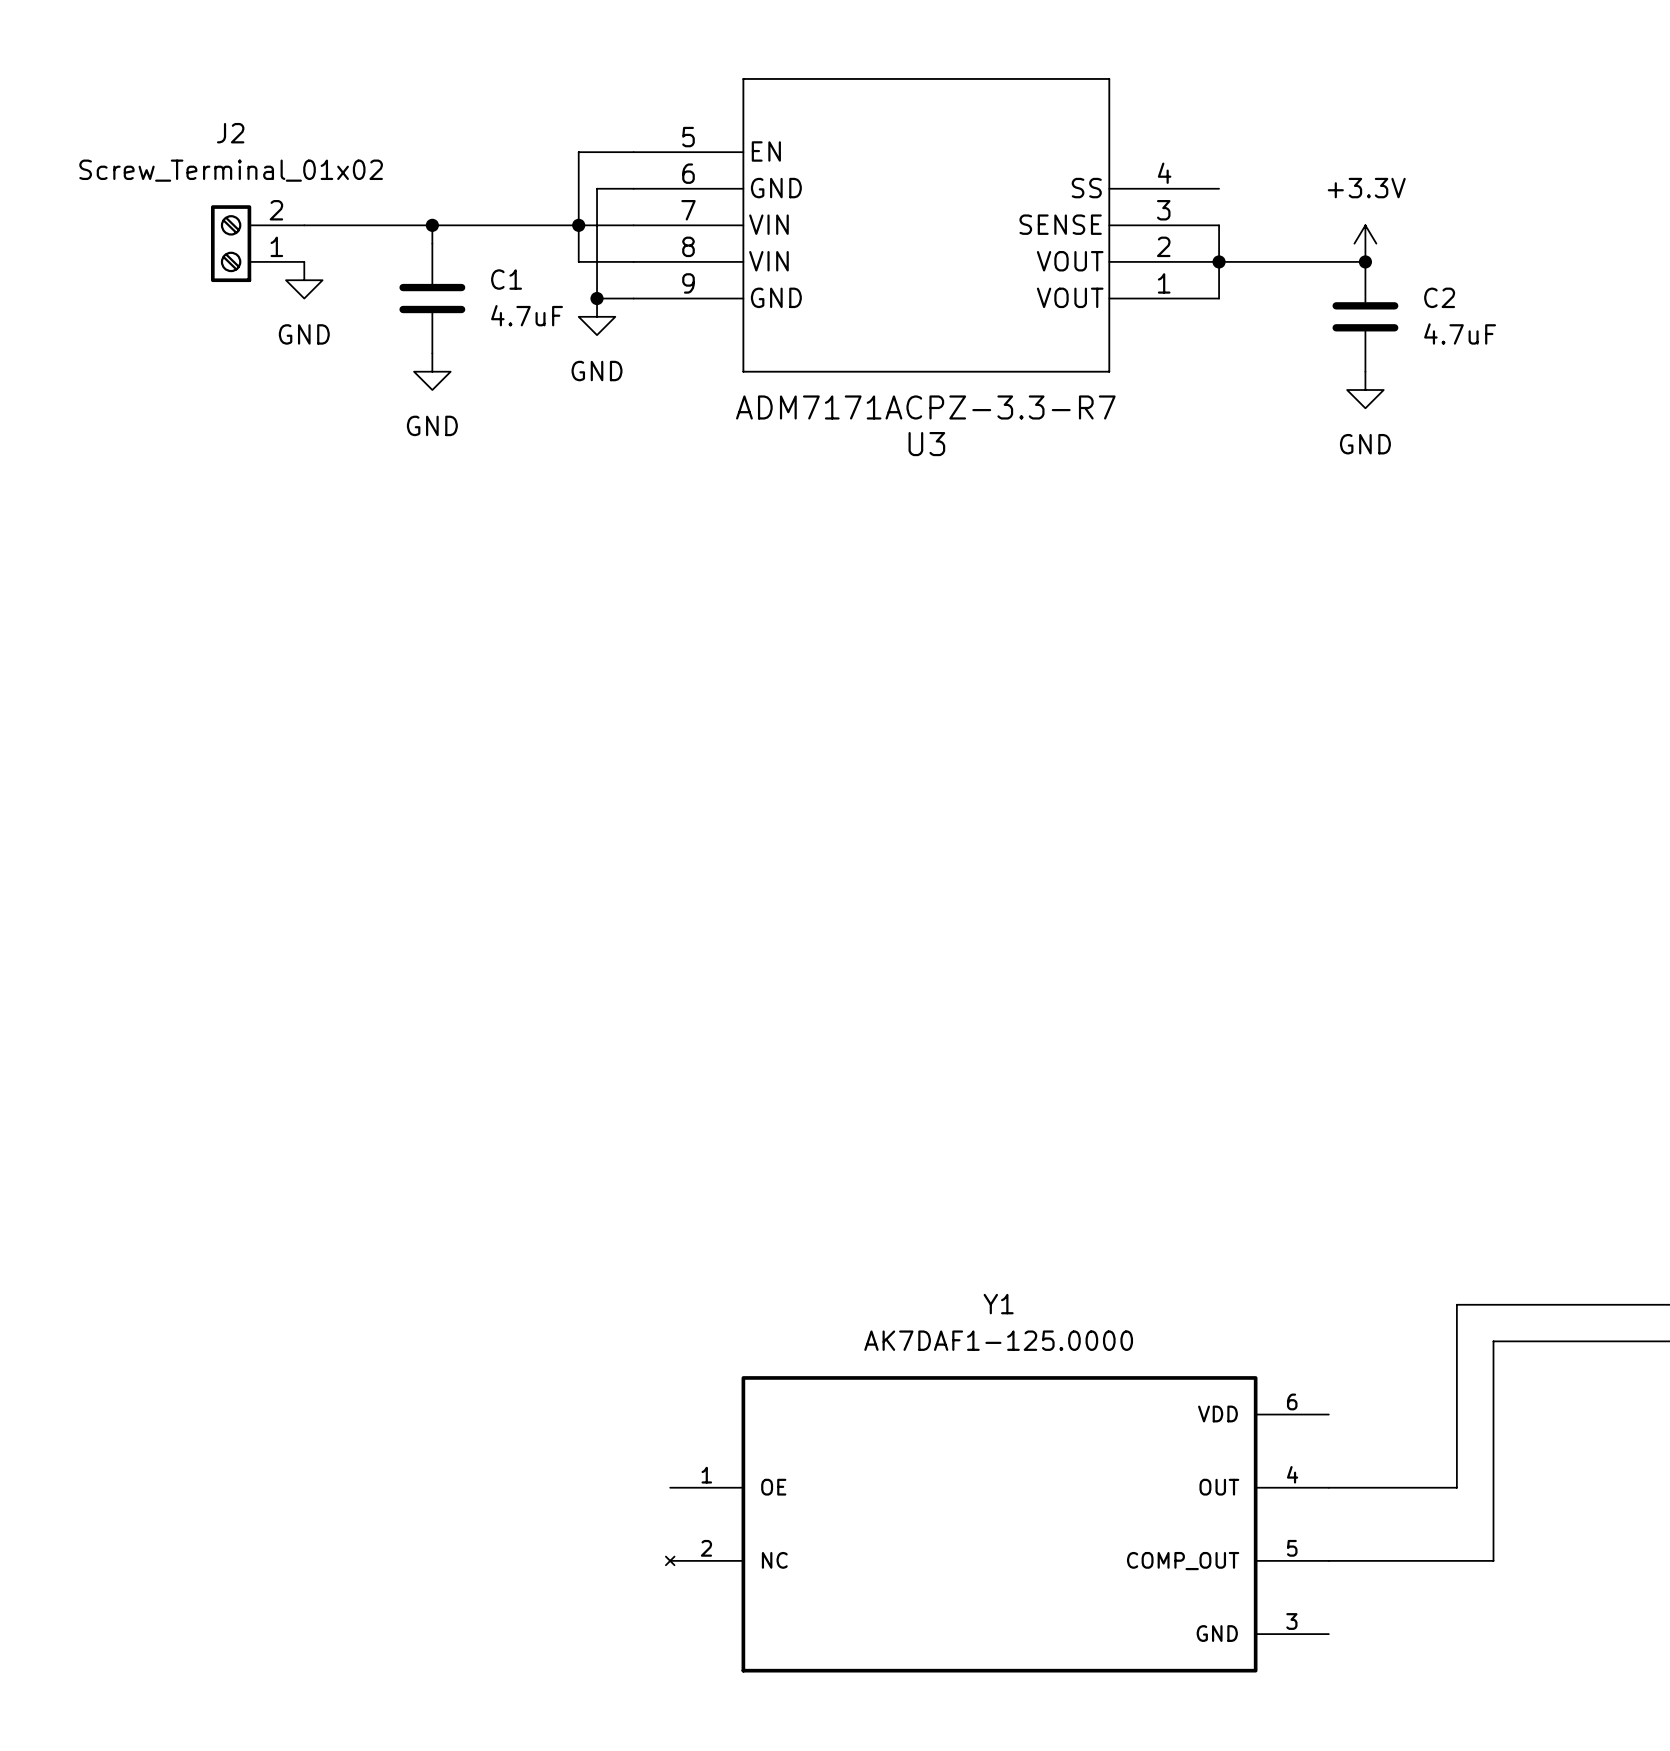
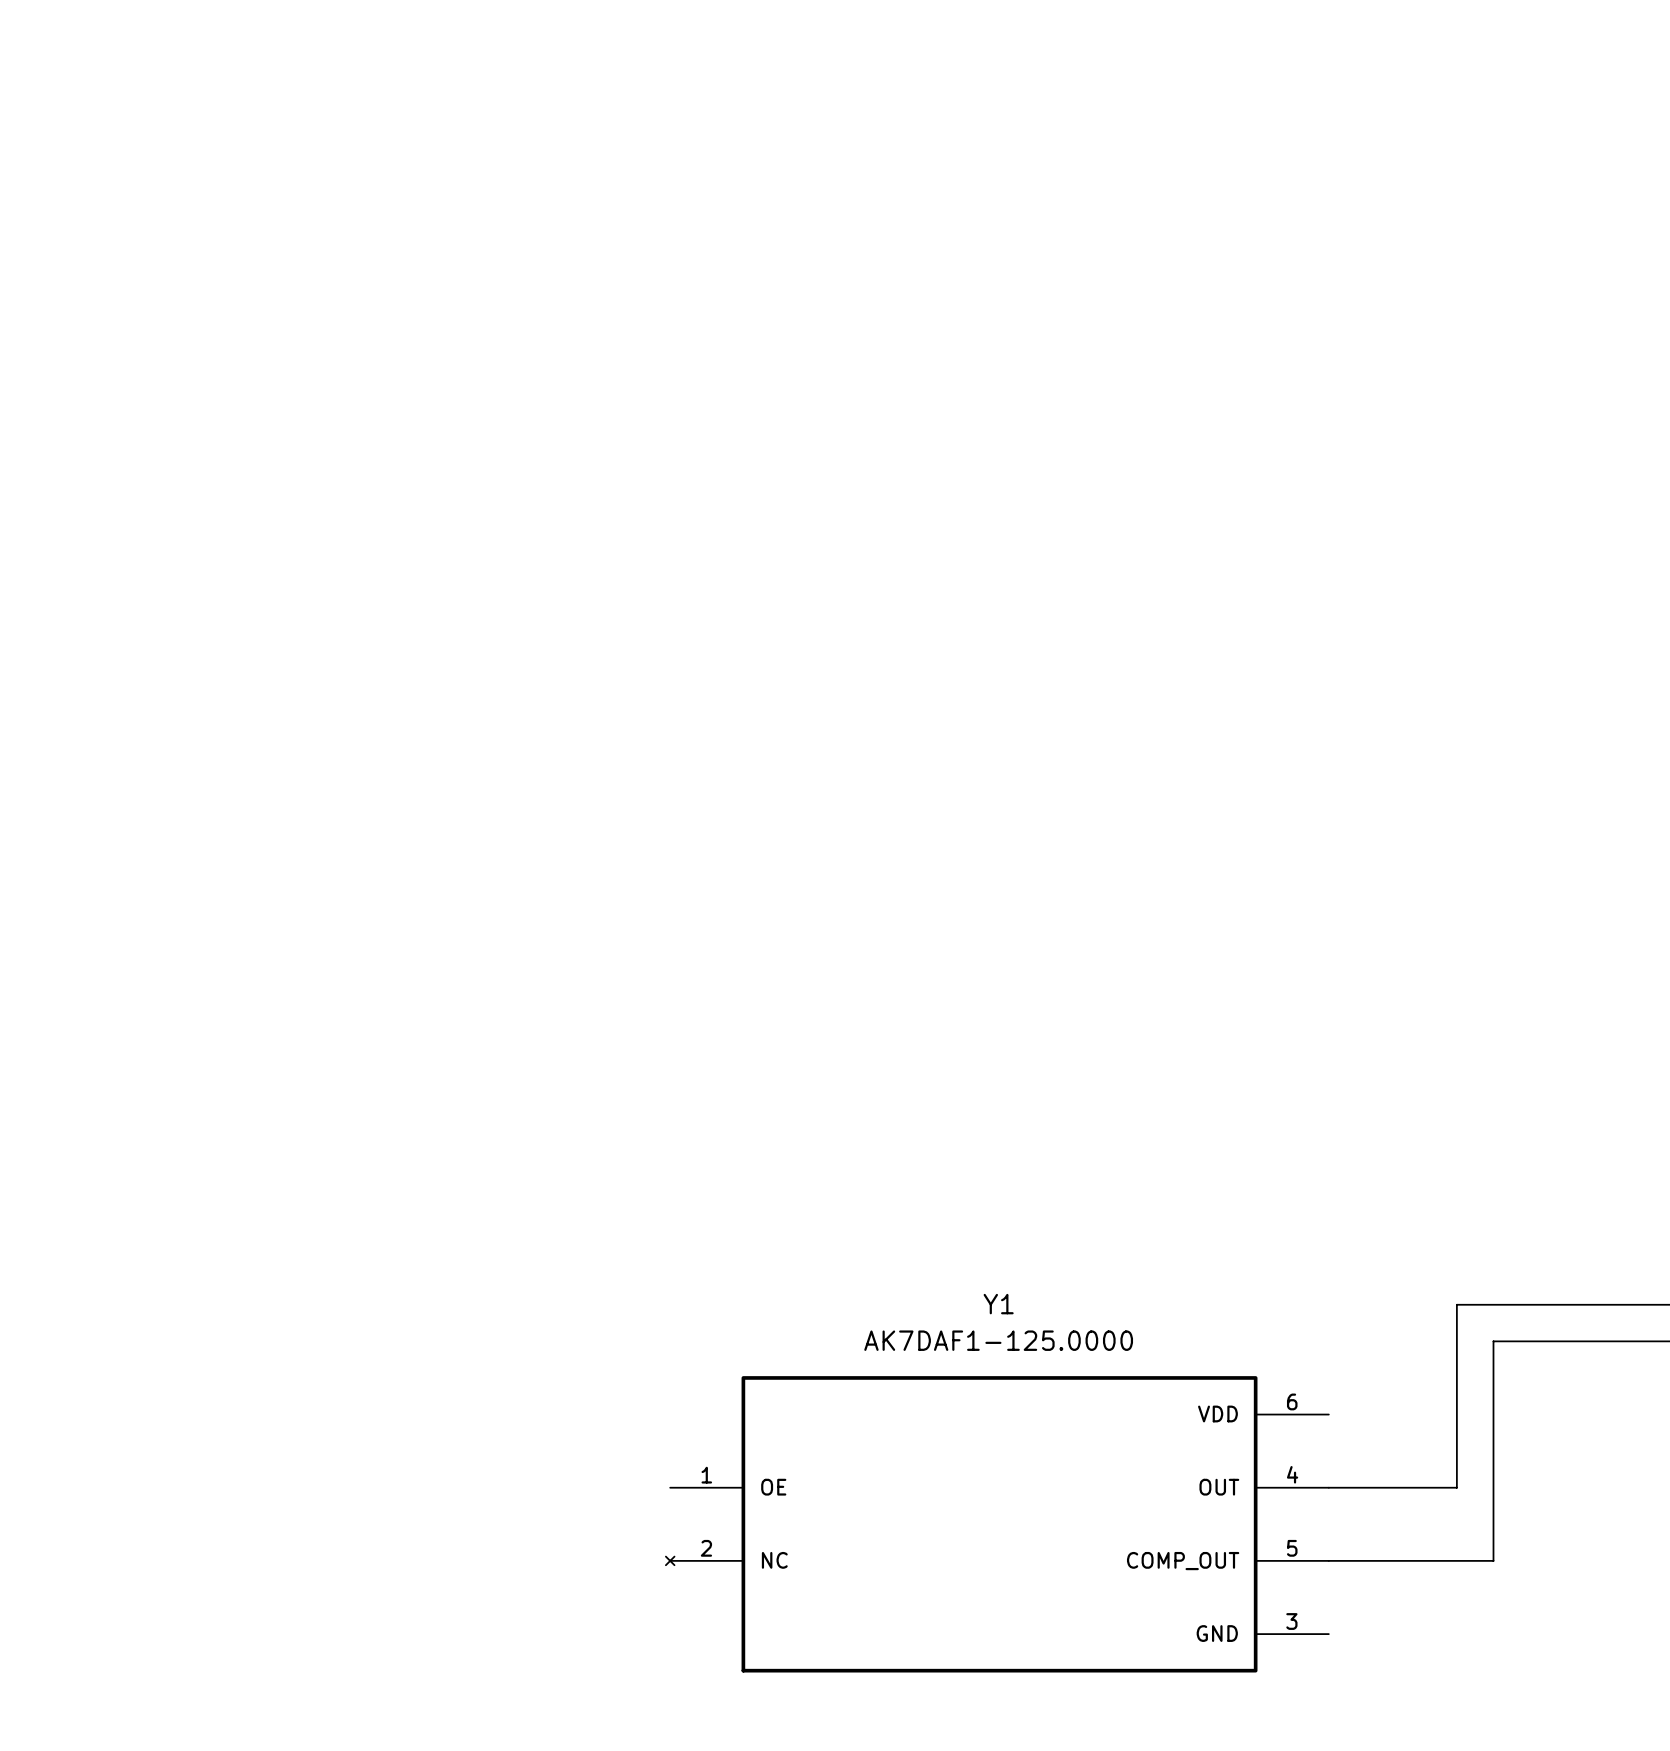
wire: (633, 152) (578, 152) (578, 261) (633, 261) -> none
wire: (633, 188) (597, 188) (597, 298) (633, 298) -> none
wire: (304, 225) (633, 225) -> none
wire: (432, 225) (432, 243) -> none
junction: (432, 225) -> none
junction: (578, 225) -> none
U3: ADM7171ACPZ-3.3-R7 (926, 225) -> none
wire: (1219, 225) (1219, 298) -> none
J2: Screw_Terminal_01x02 (257, 243) -> none
power symbol: +3.3V (1365, 243) -> none
wire: (1219, 261) (1365, 261) -> none
junction: (1219, 261) -> none
junction: (1365, 261) -> none
power symbol: GND (304, 280) -> none
C1: 4.7uF (432, 298) -> none
junction: (597, 298) -> none
power symbol: GND (597, 316) -> none
C2: 4.7uF (1365, 316) -> none
power symbol: GND (432, 371) -> none
power symbol: GND (1365, 390) -> none

